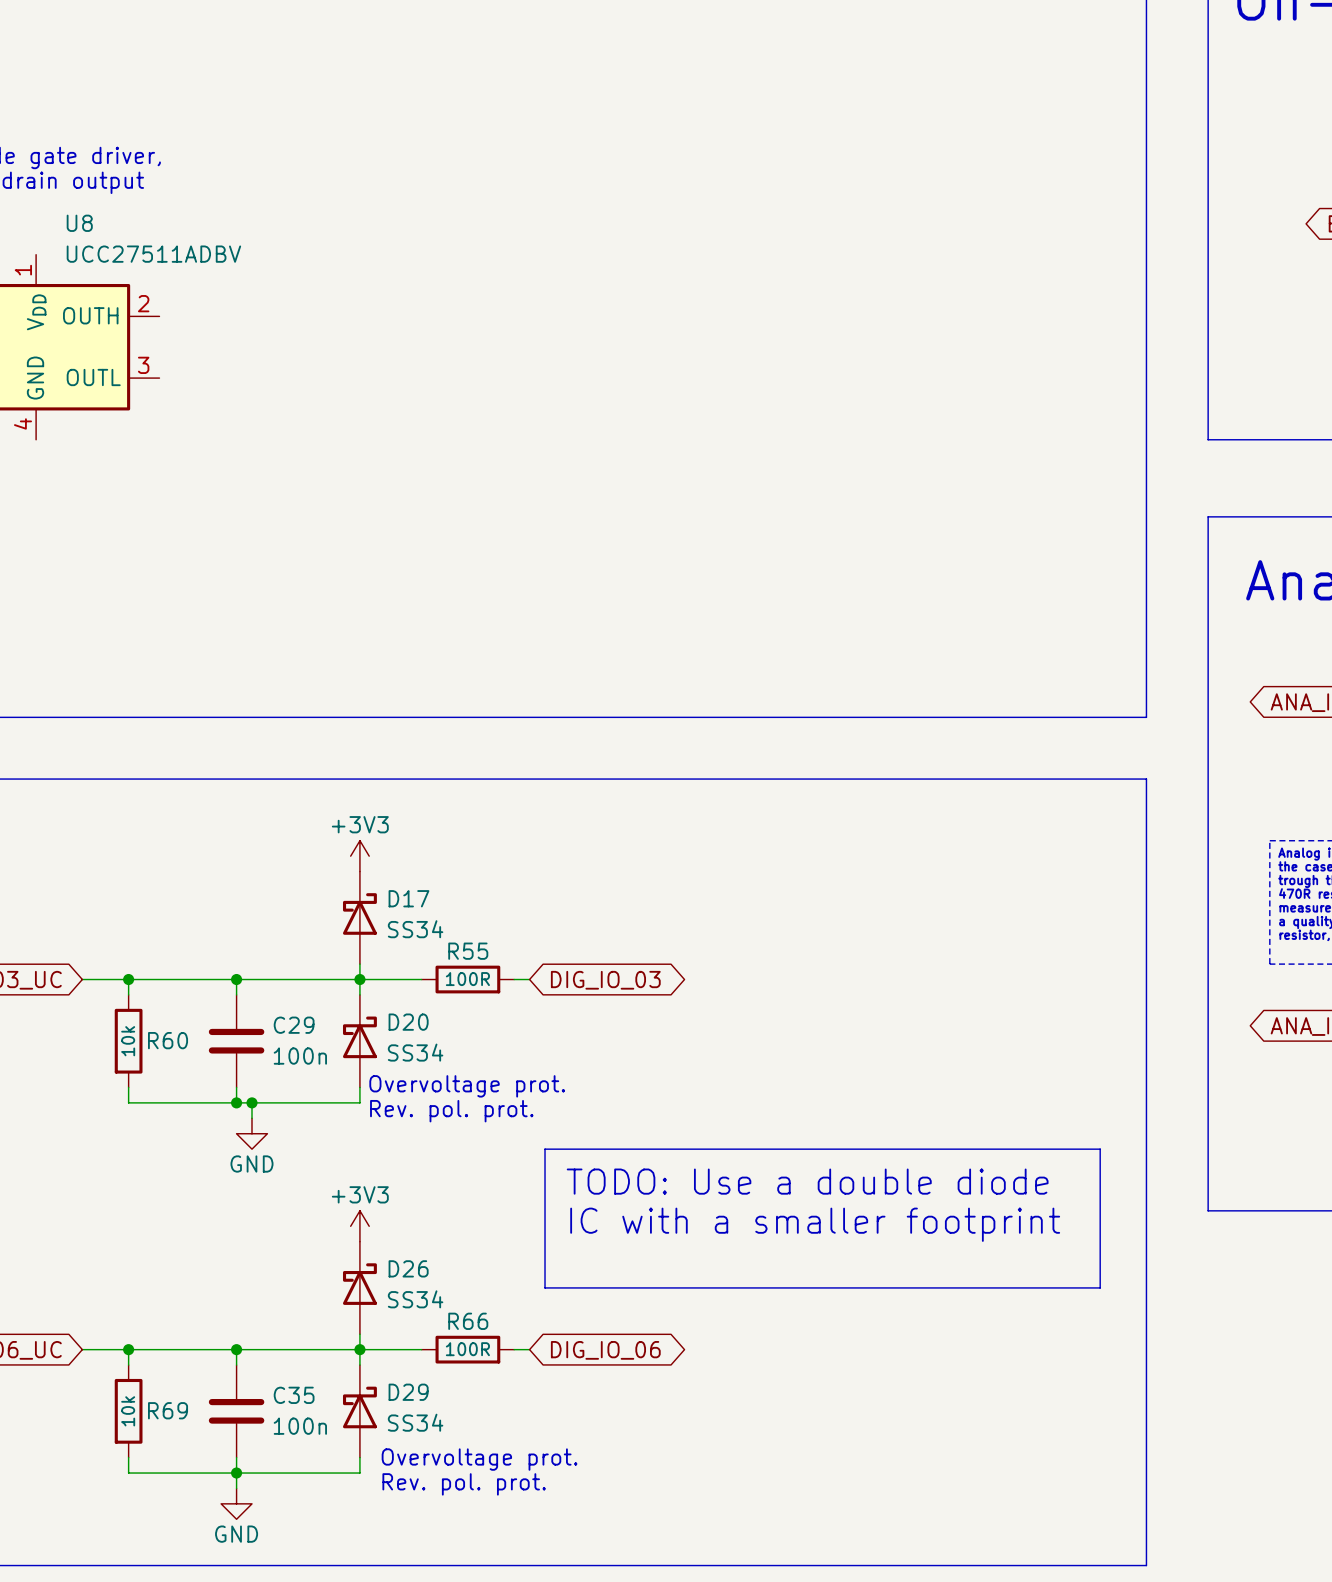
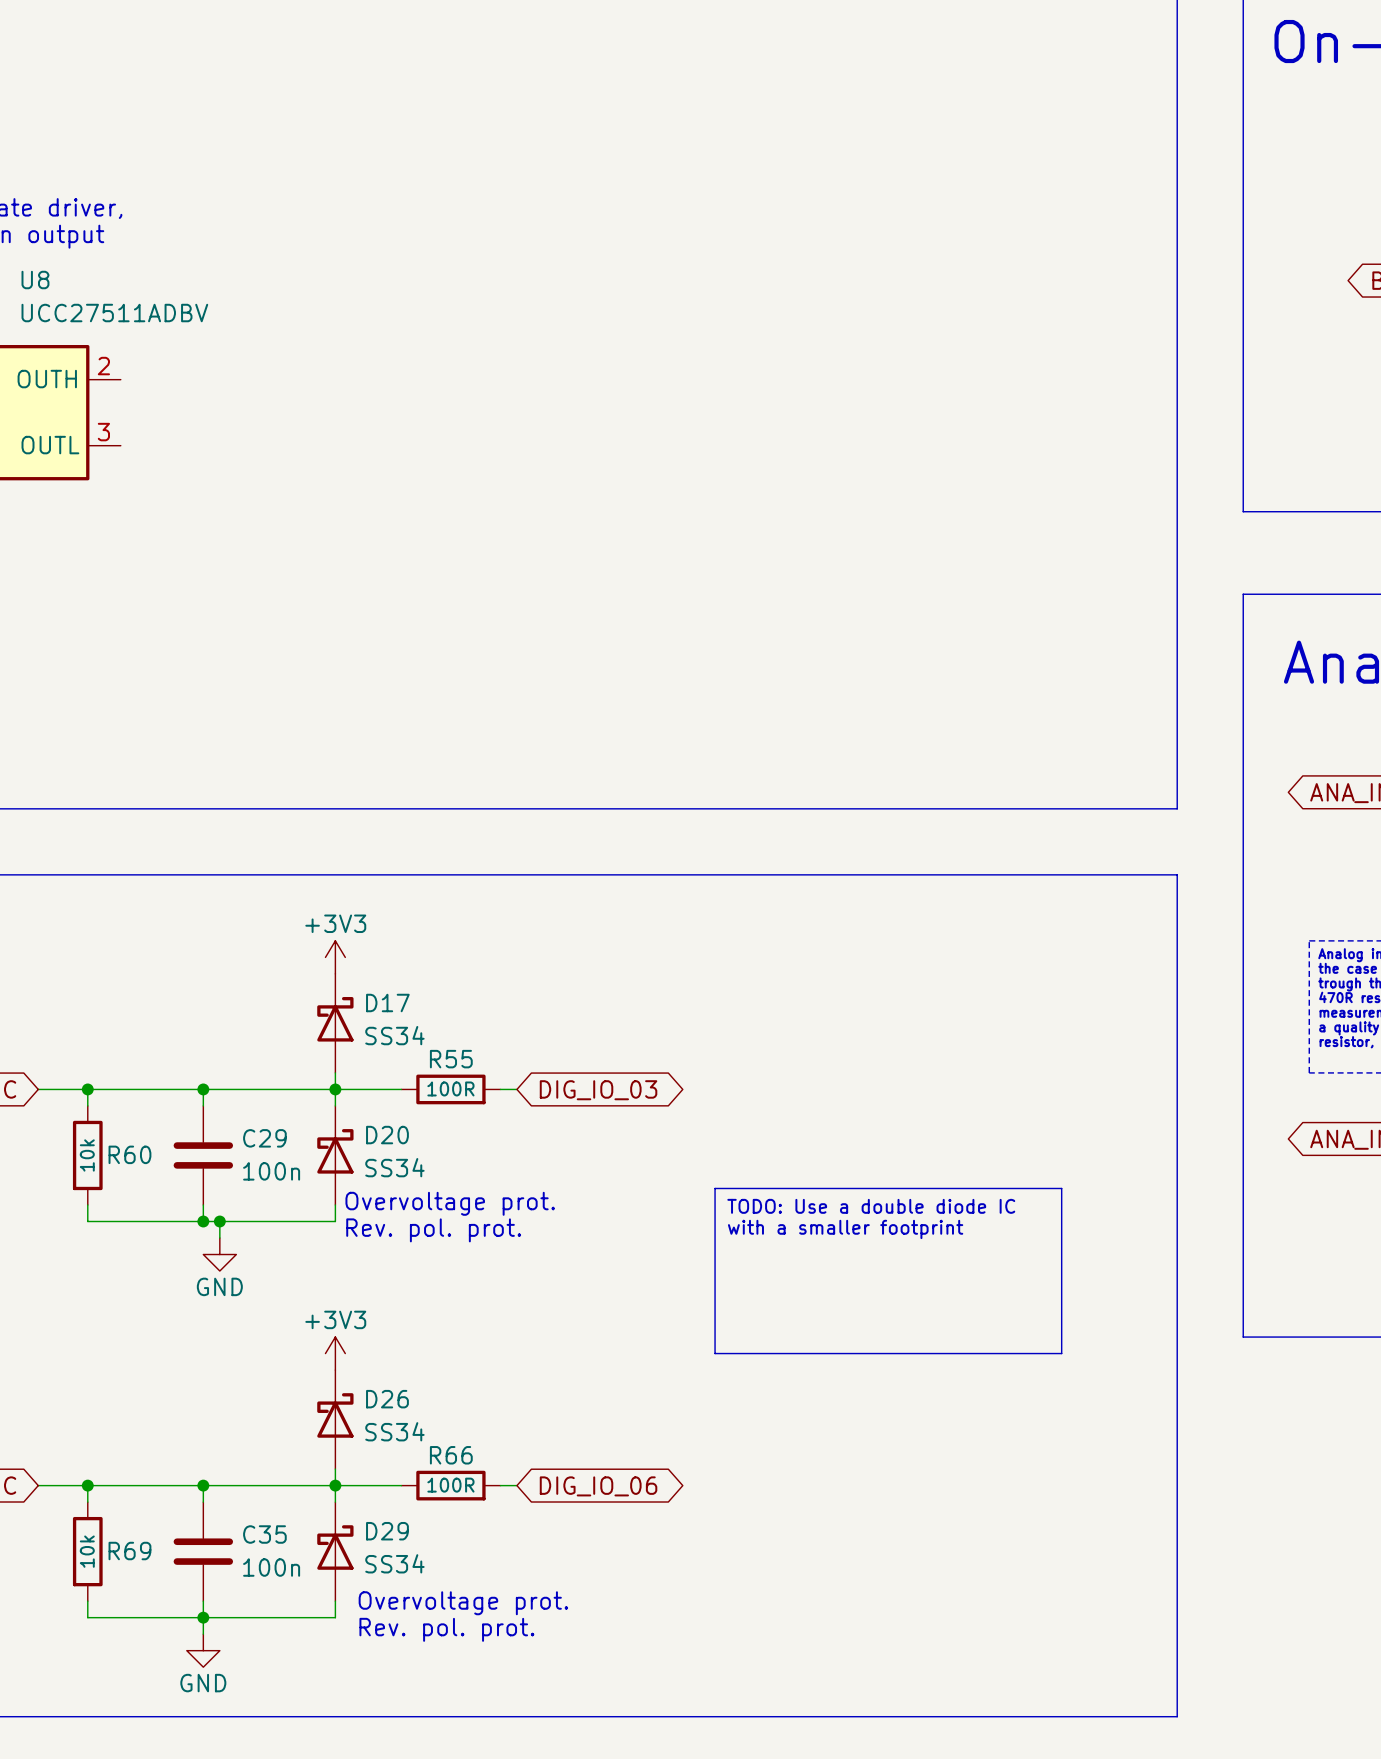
line: none -> (715, 1188) (1061, 1188) (1061, 1353) (715, 1353) (715, 1188)
text: none -> TODO: Use a double diode IC (871, 1206)
text: none -> with a smaller footprint (845, 1229)
line: (545, 1149) (1100, 1149) (1100, 1287) (545, 1287) (545, 1149) -> none
text: TODO: Use a double diode (807, 1181) -> none
text: IC with a smaller footprint (815, 1224) -> none

